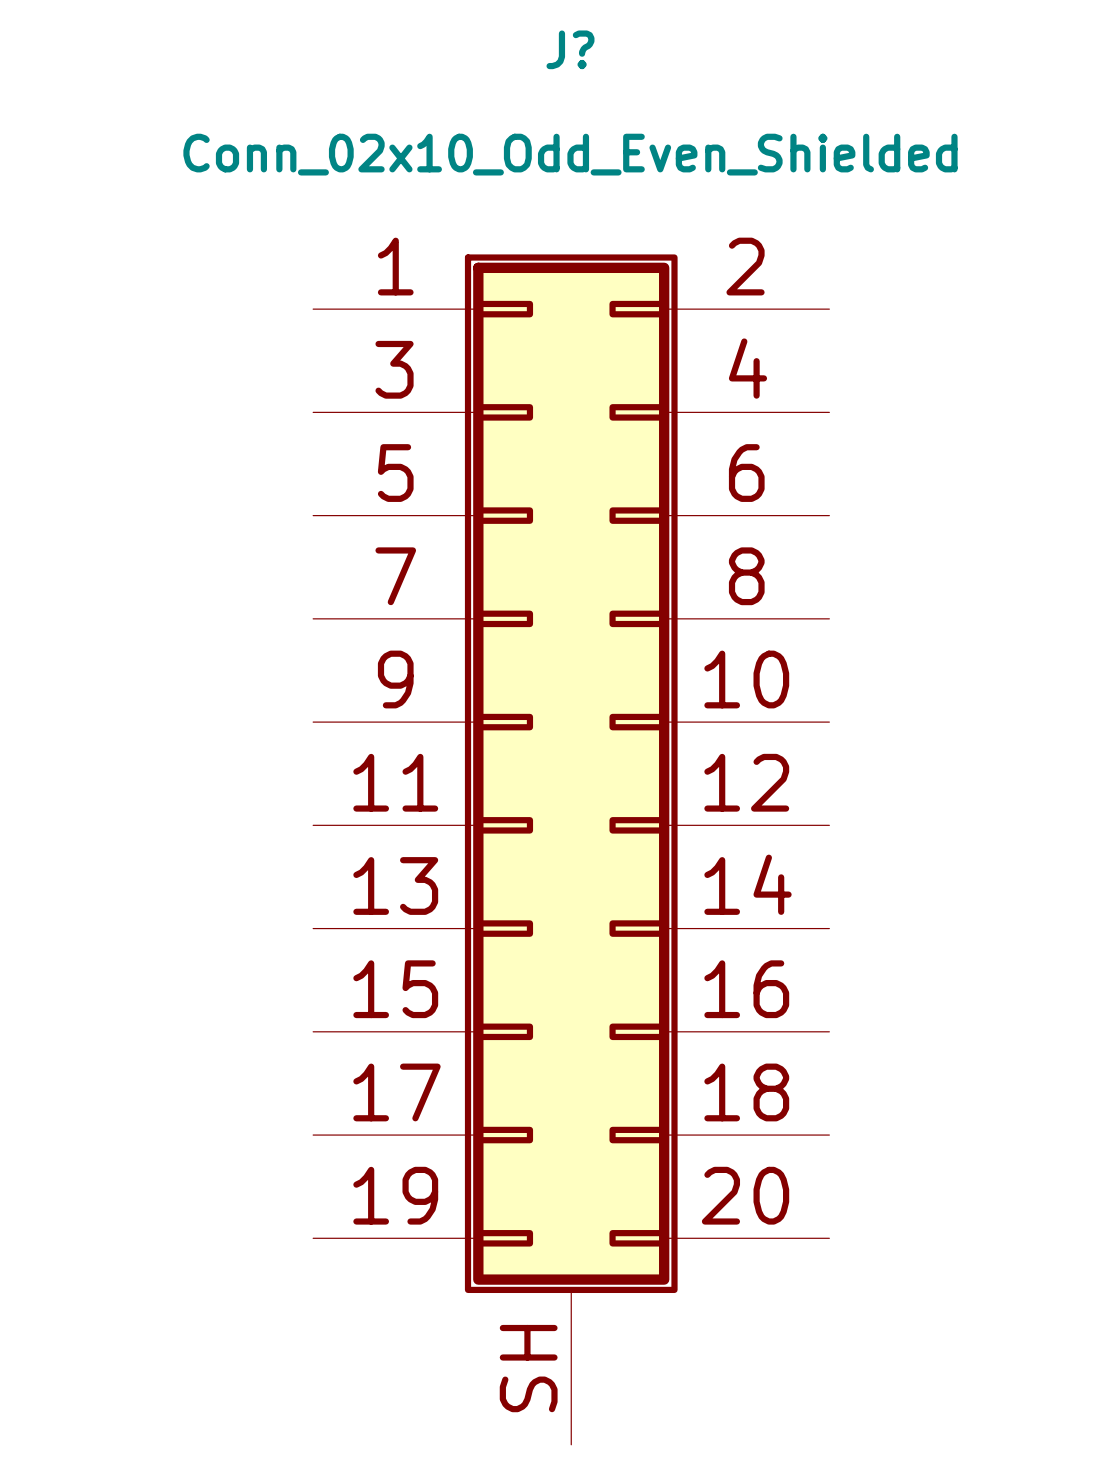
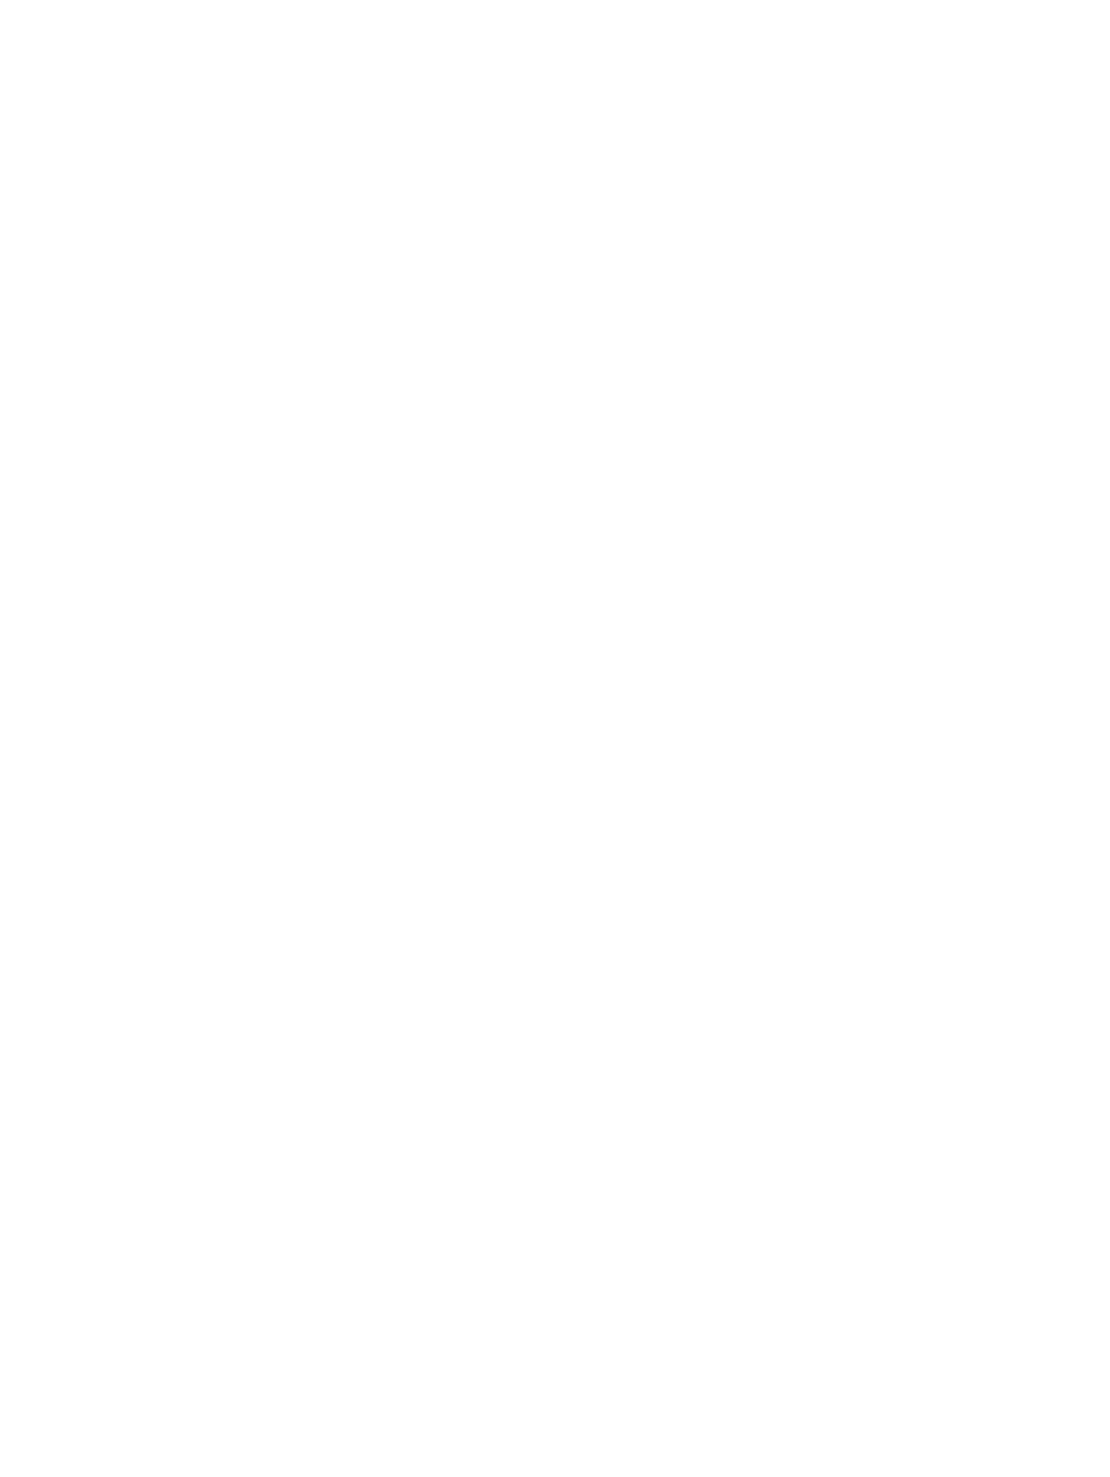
J?: Conn_02x10_Odd_Even_Shielded (571, 849) -> none

